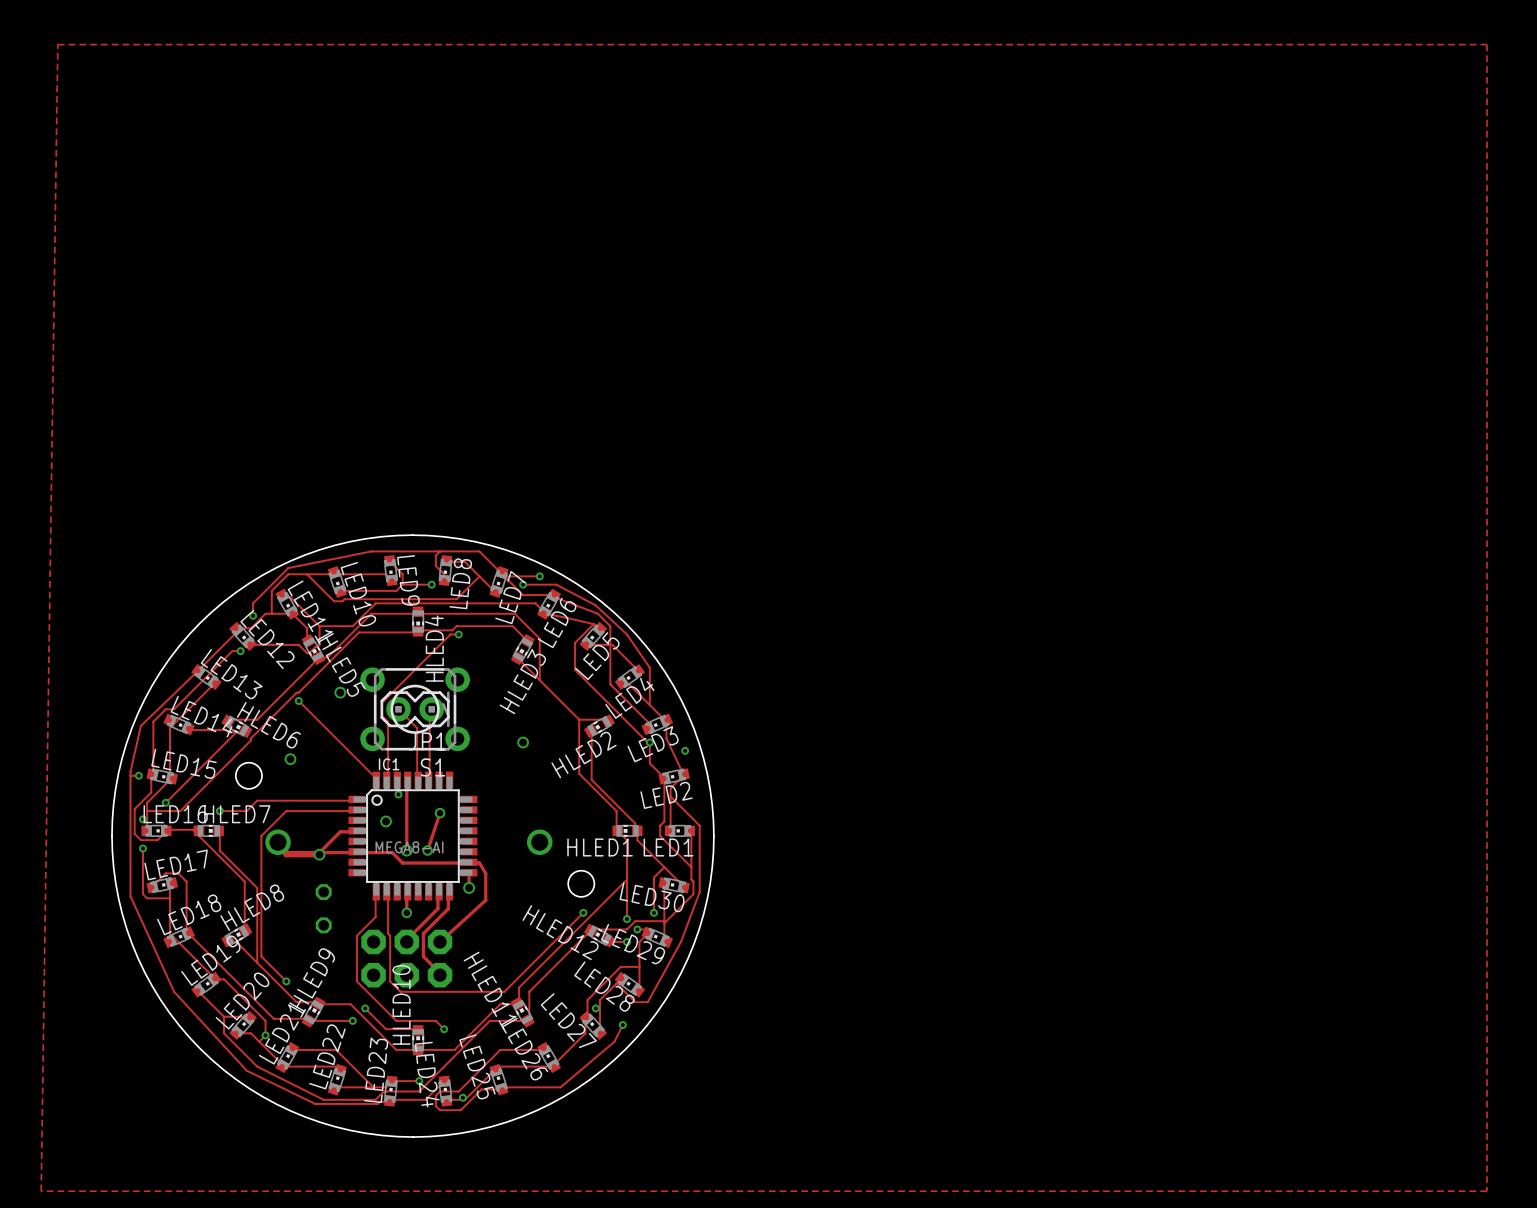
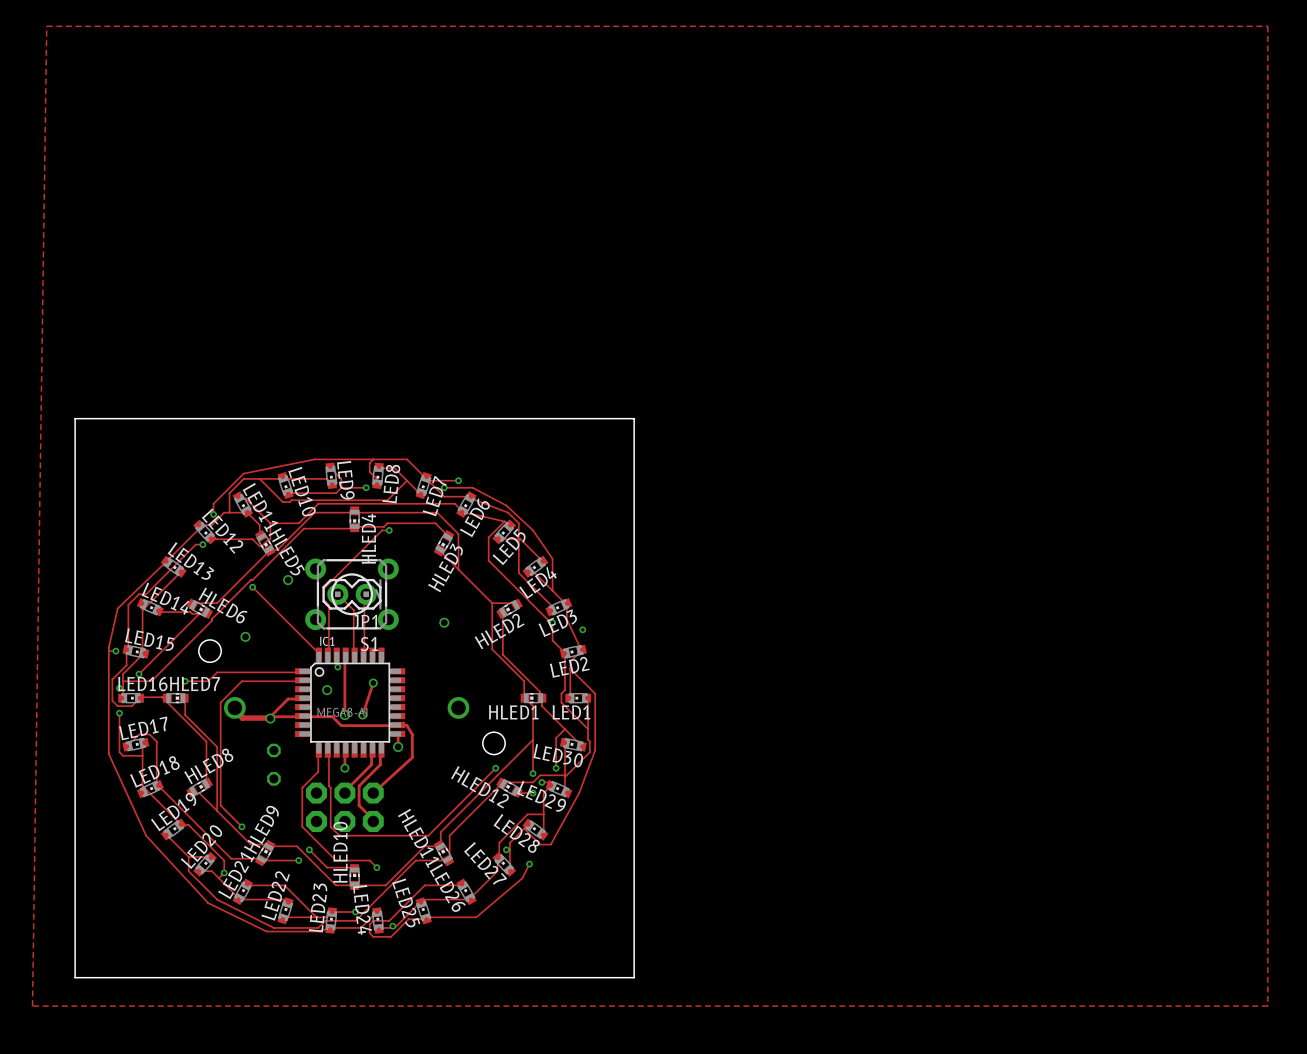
board edge: (412, 535) (444, 536) (475, 541) (505, 549) (535, 561) (563, 575) (589, 592) (625, 623) (656, 659) (673, 685) (687, 713) (699, 743) (707, 773) (712, 804) (713, 836) (712, 867) (707, 898) (693, 944) (681, 972) (665, 1000) (646, 1025) (625, 1049) (602, 1070) (577, 1088) (549, 1104) (521, 1117) (475, 1130) (444, 1135) (413, 1137) (381, 1135) (350, 1130) (320, 1122) (290, 1111) (262, 1096) (236, 1079) (200, 1048) (169, 1012) (152, 986) (138, 958) (126, 928) (118, 898) (113, 867) (111, 835) (113, 804) (118, 773) (131, 727) (144, 699) (160, 672) (178, 646) (200, 623) (223, 602) (248, 583) (276, 567) (304, 555) (350, 541) (381, 536) (412, 535) -> (75, 418) (75, 977) (634, 977) (634, 418) (75, 418)

